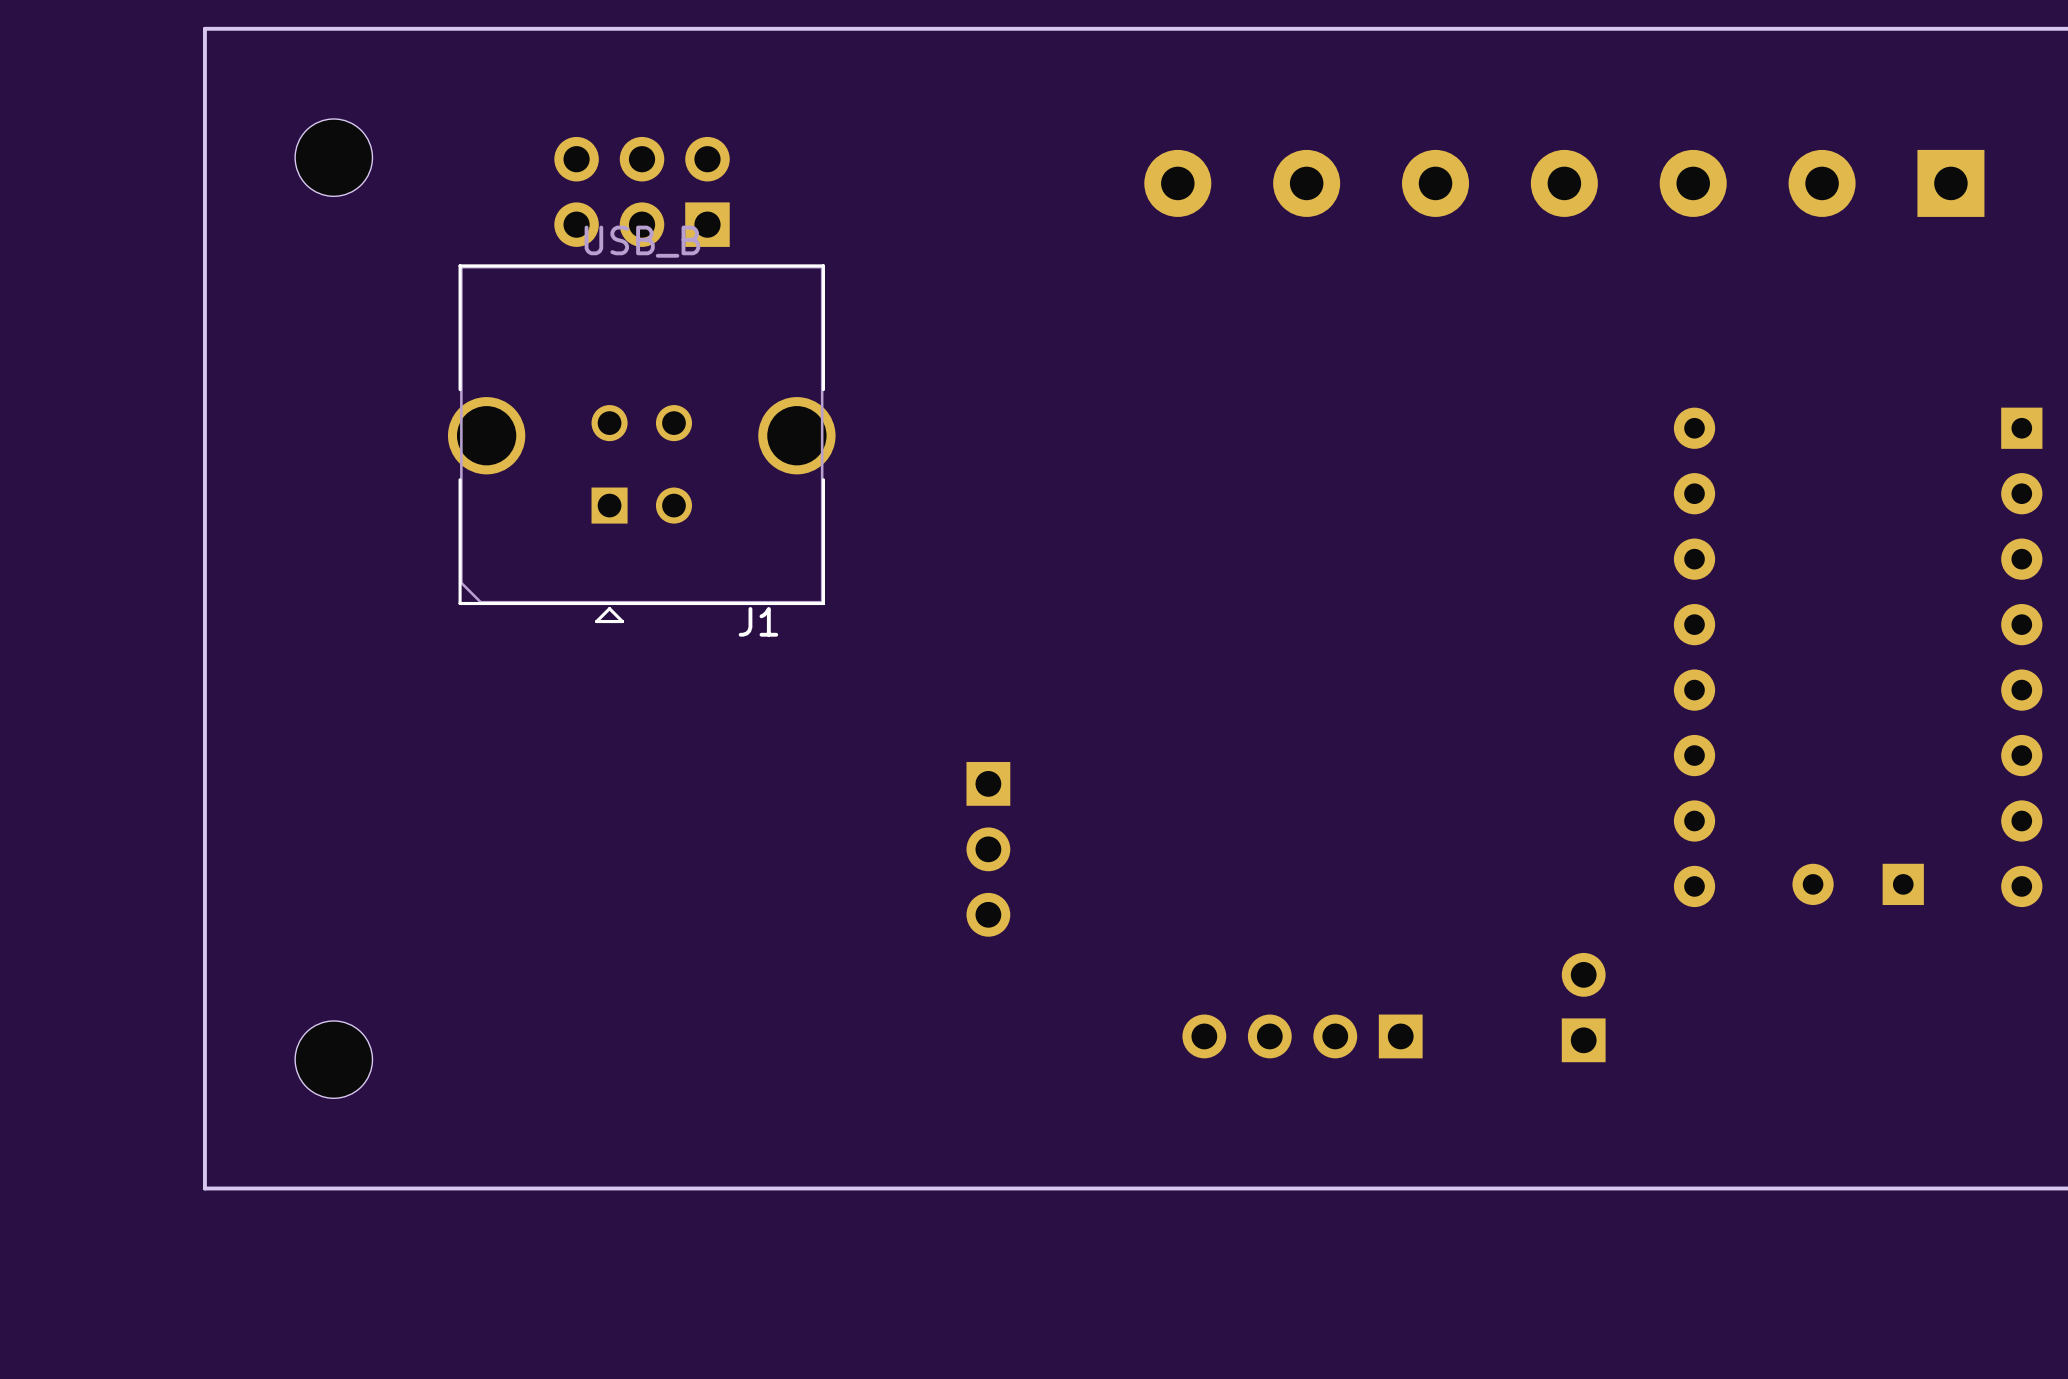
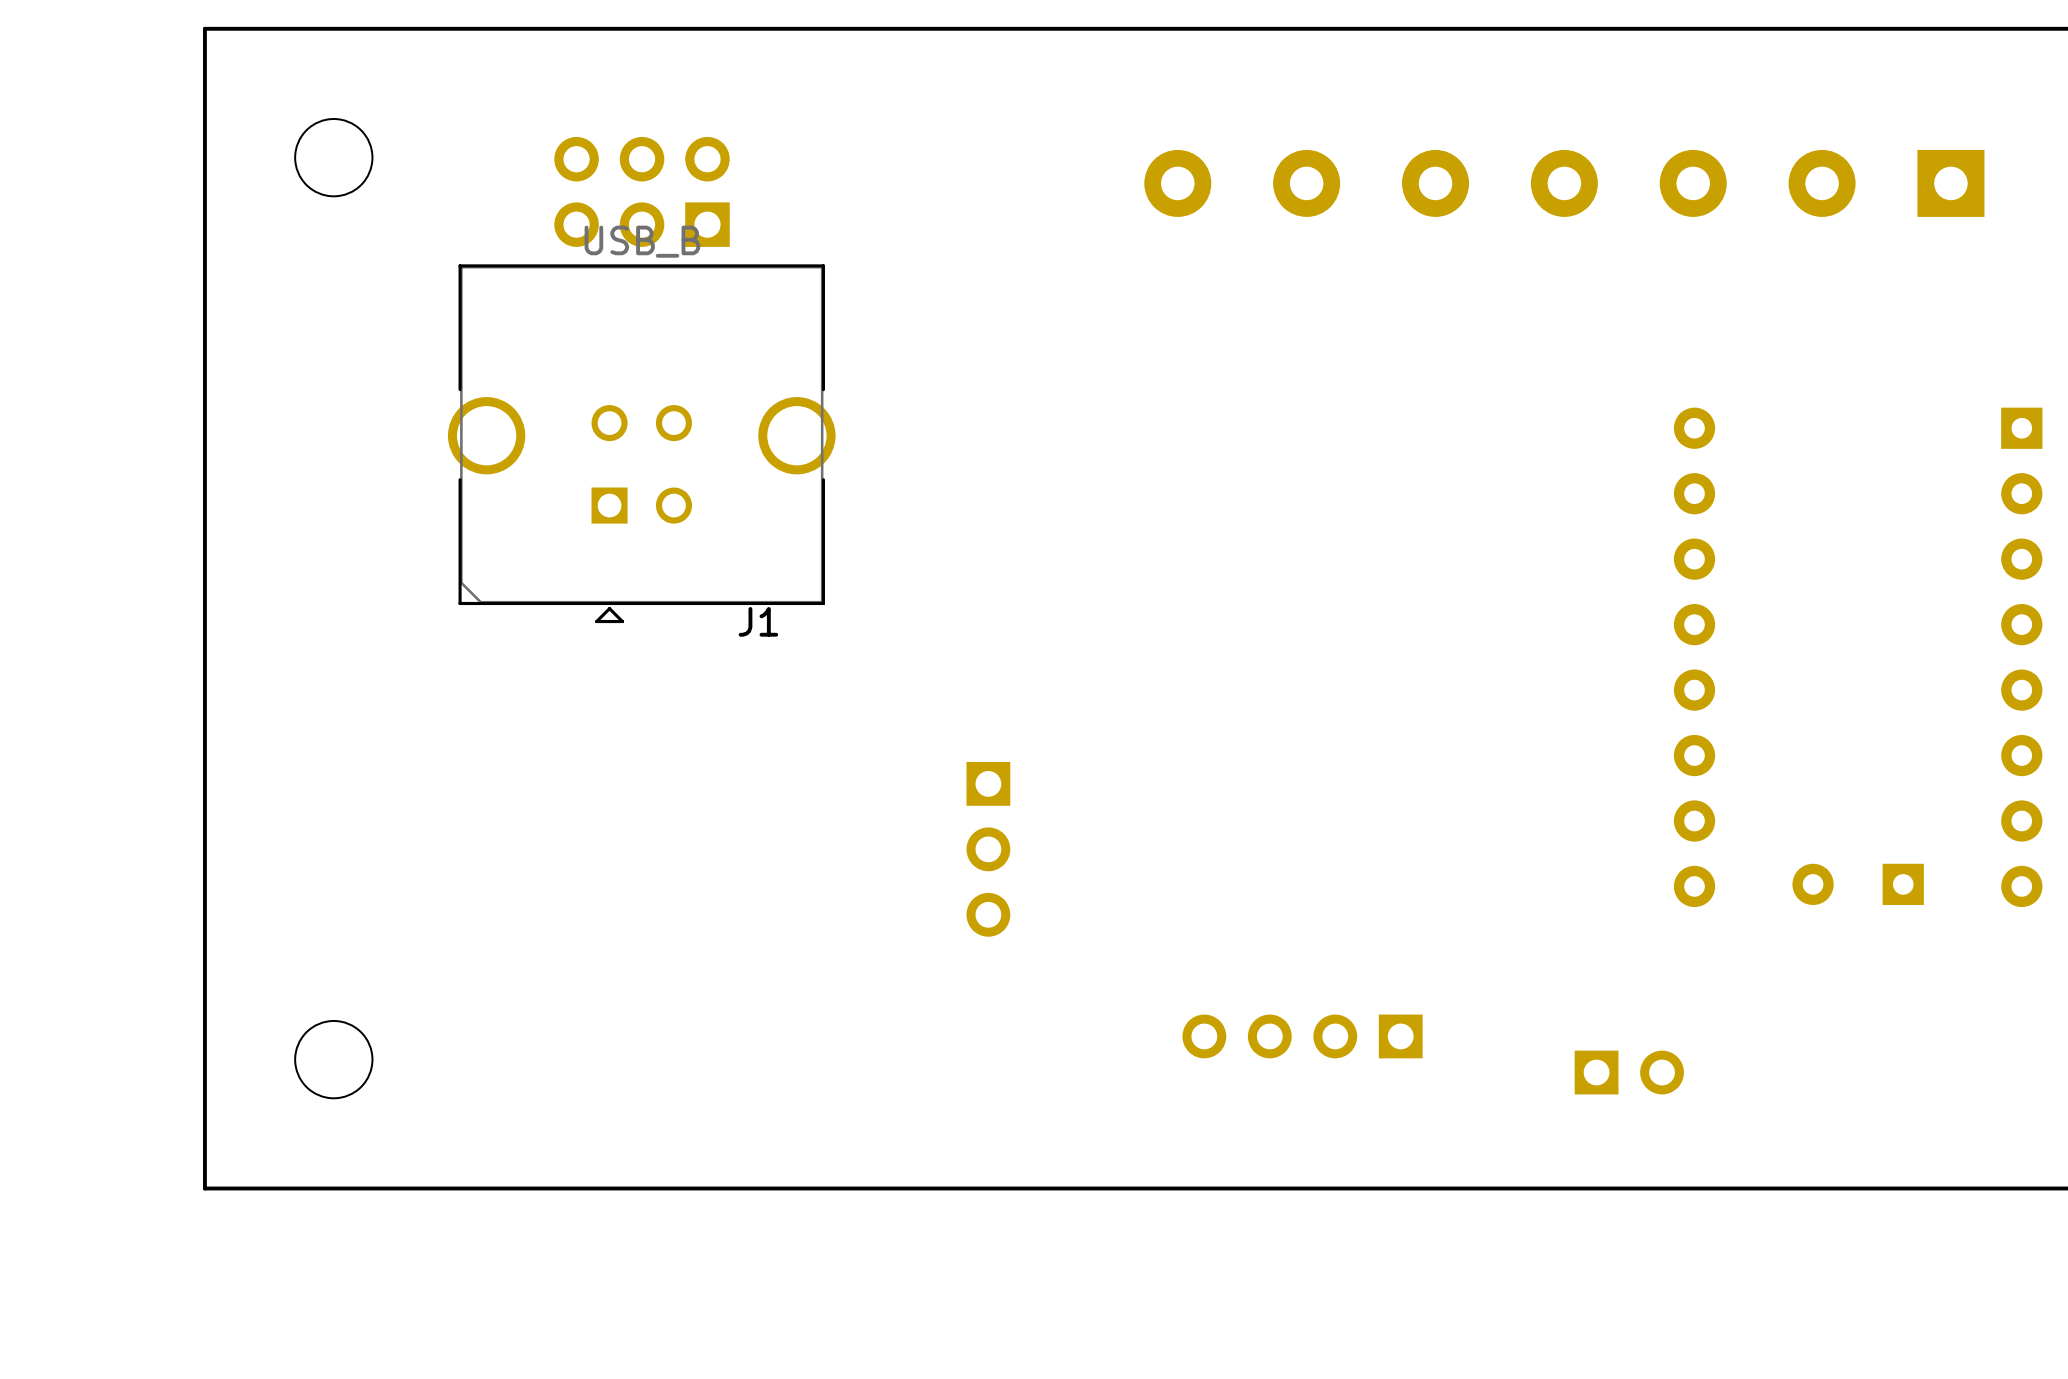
part rotation: 0° (1583, 1007) -> 90° clockwise (1629, 1072)
part position: (1583, 1007) -> (1629, 1072)

